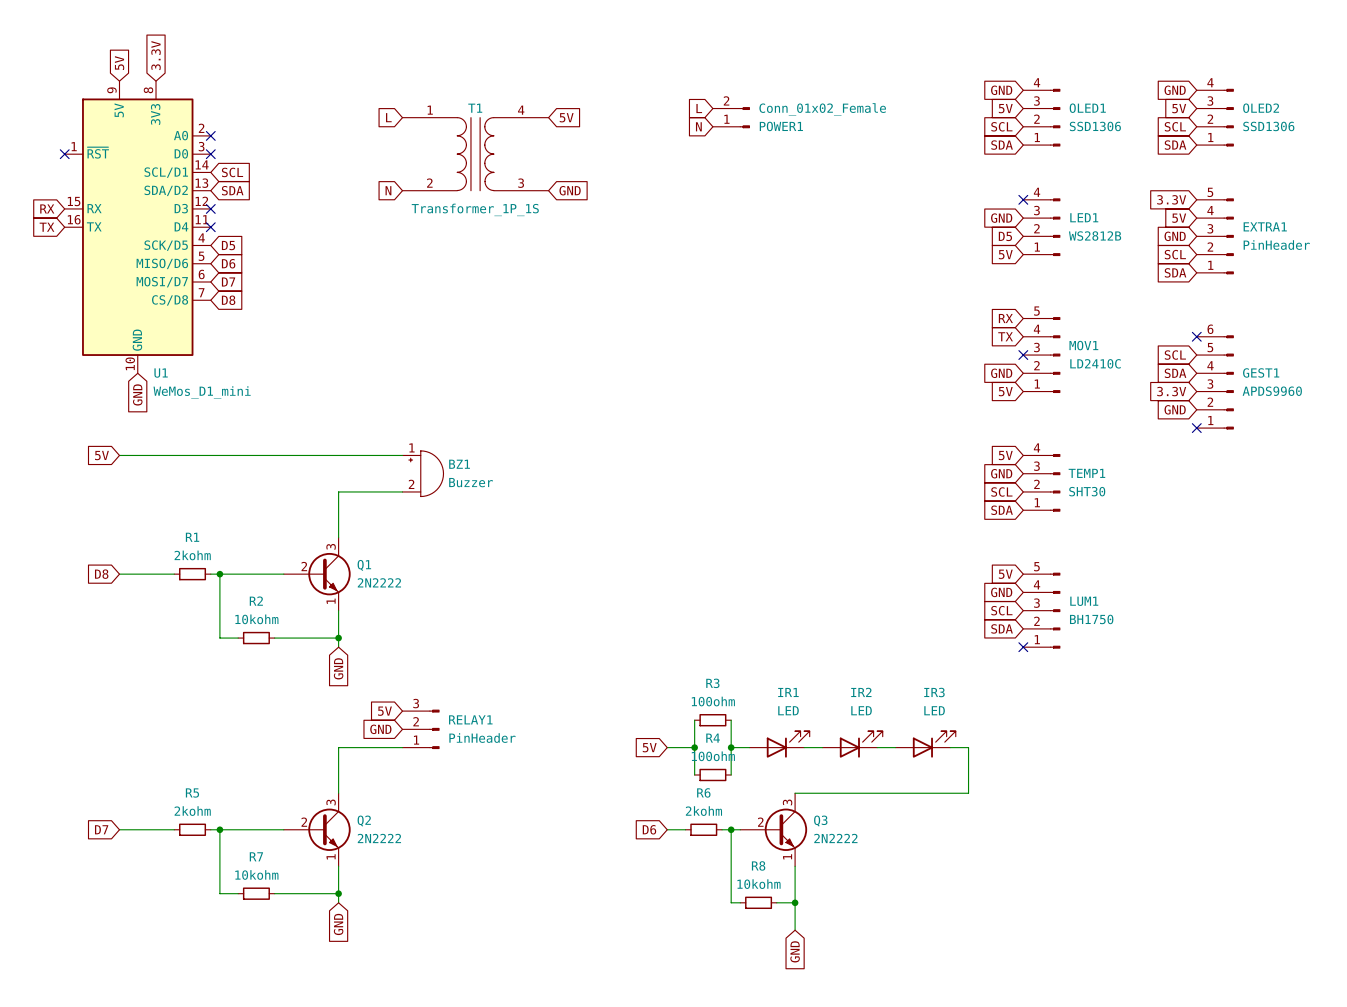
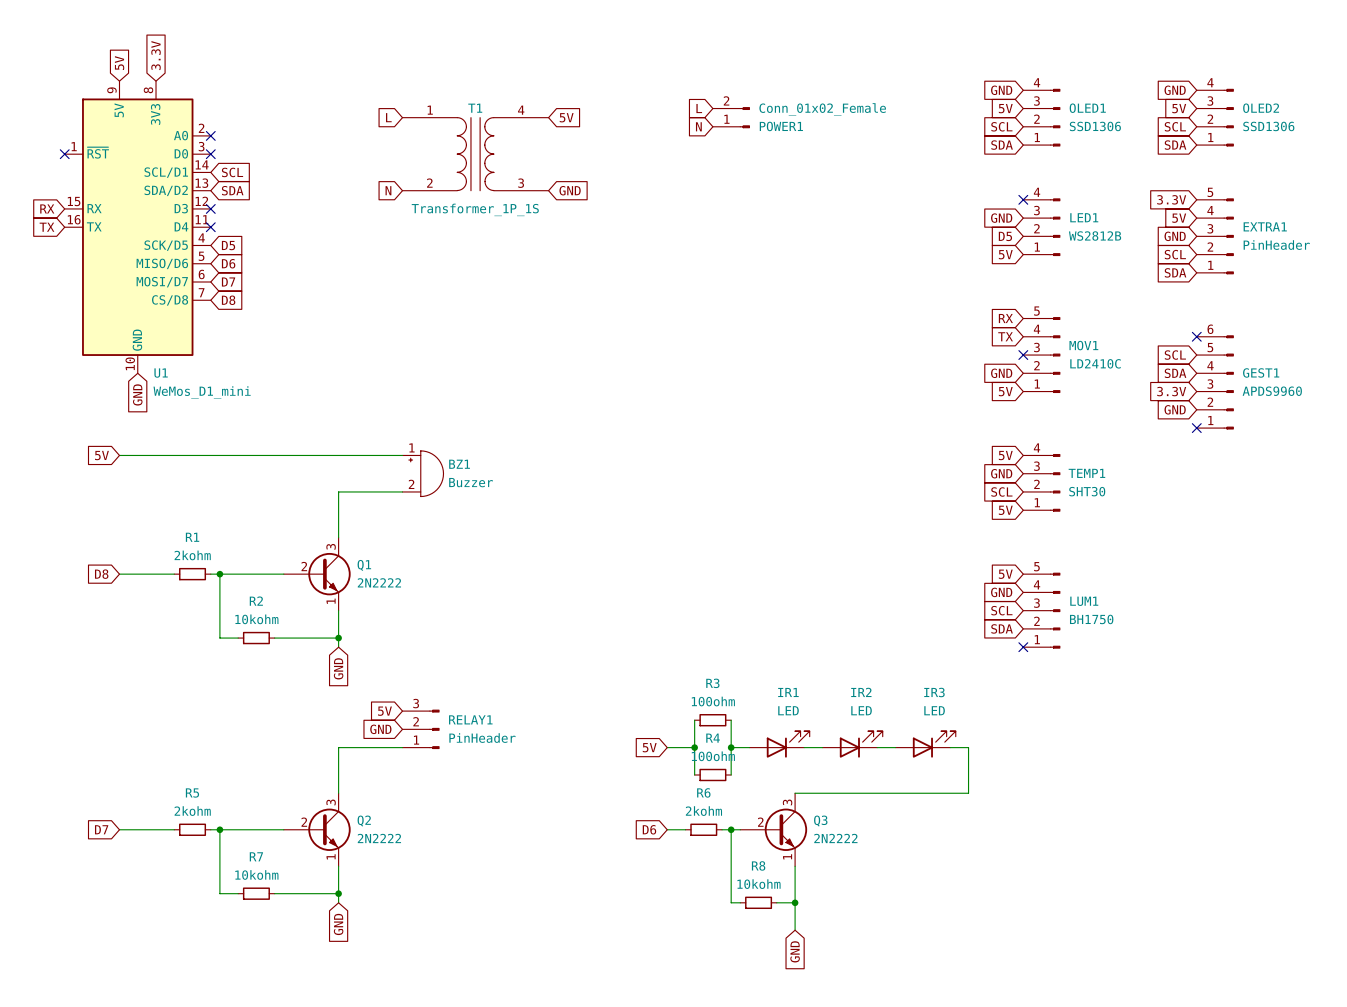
global label: SDA (1002, 510) -> 5V (1005, 510)

